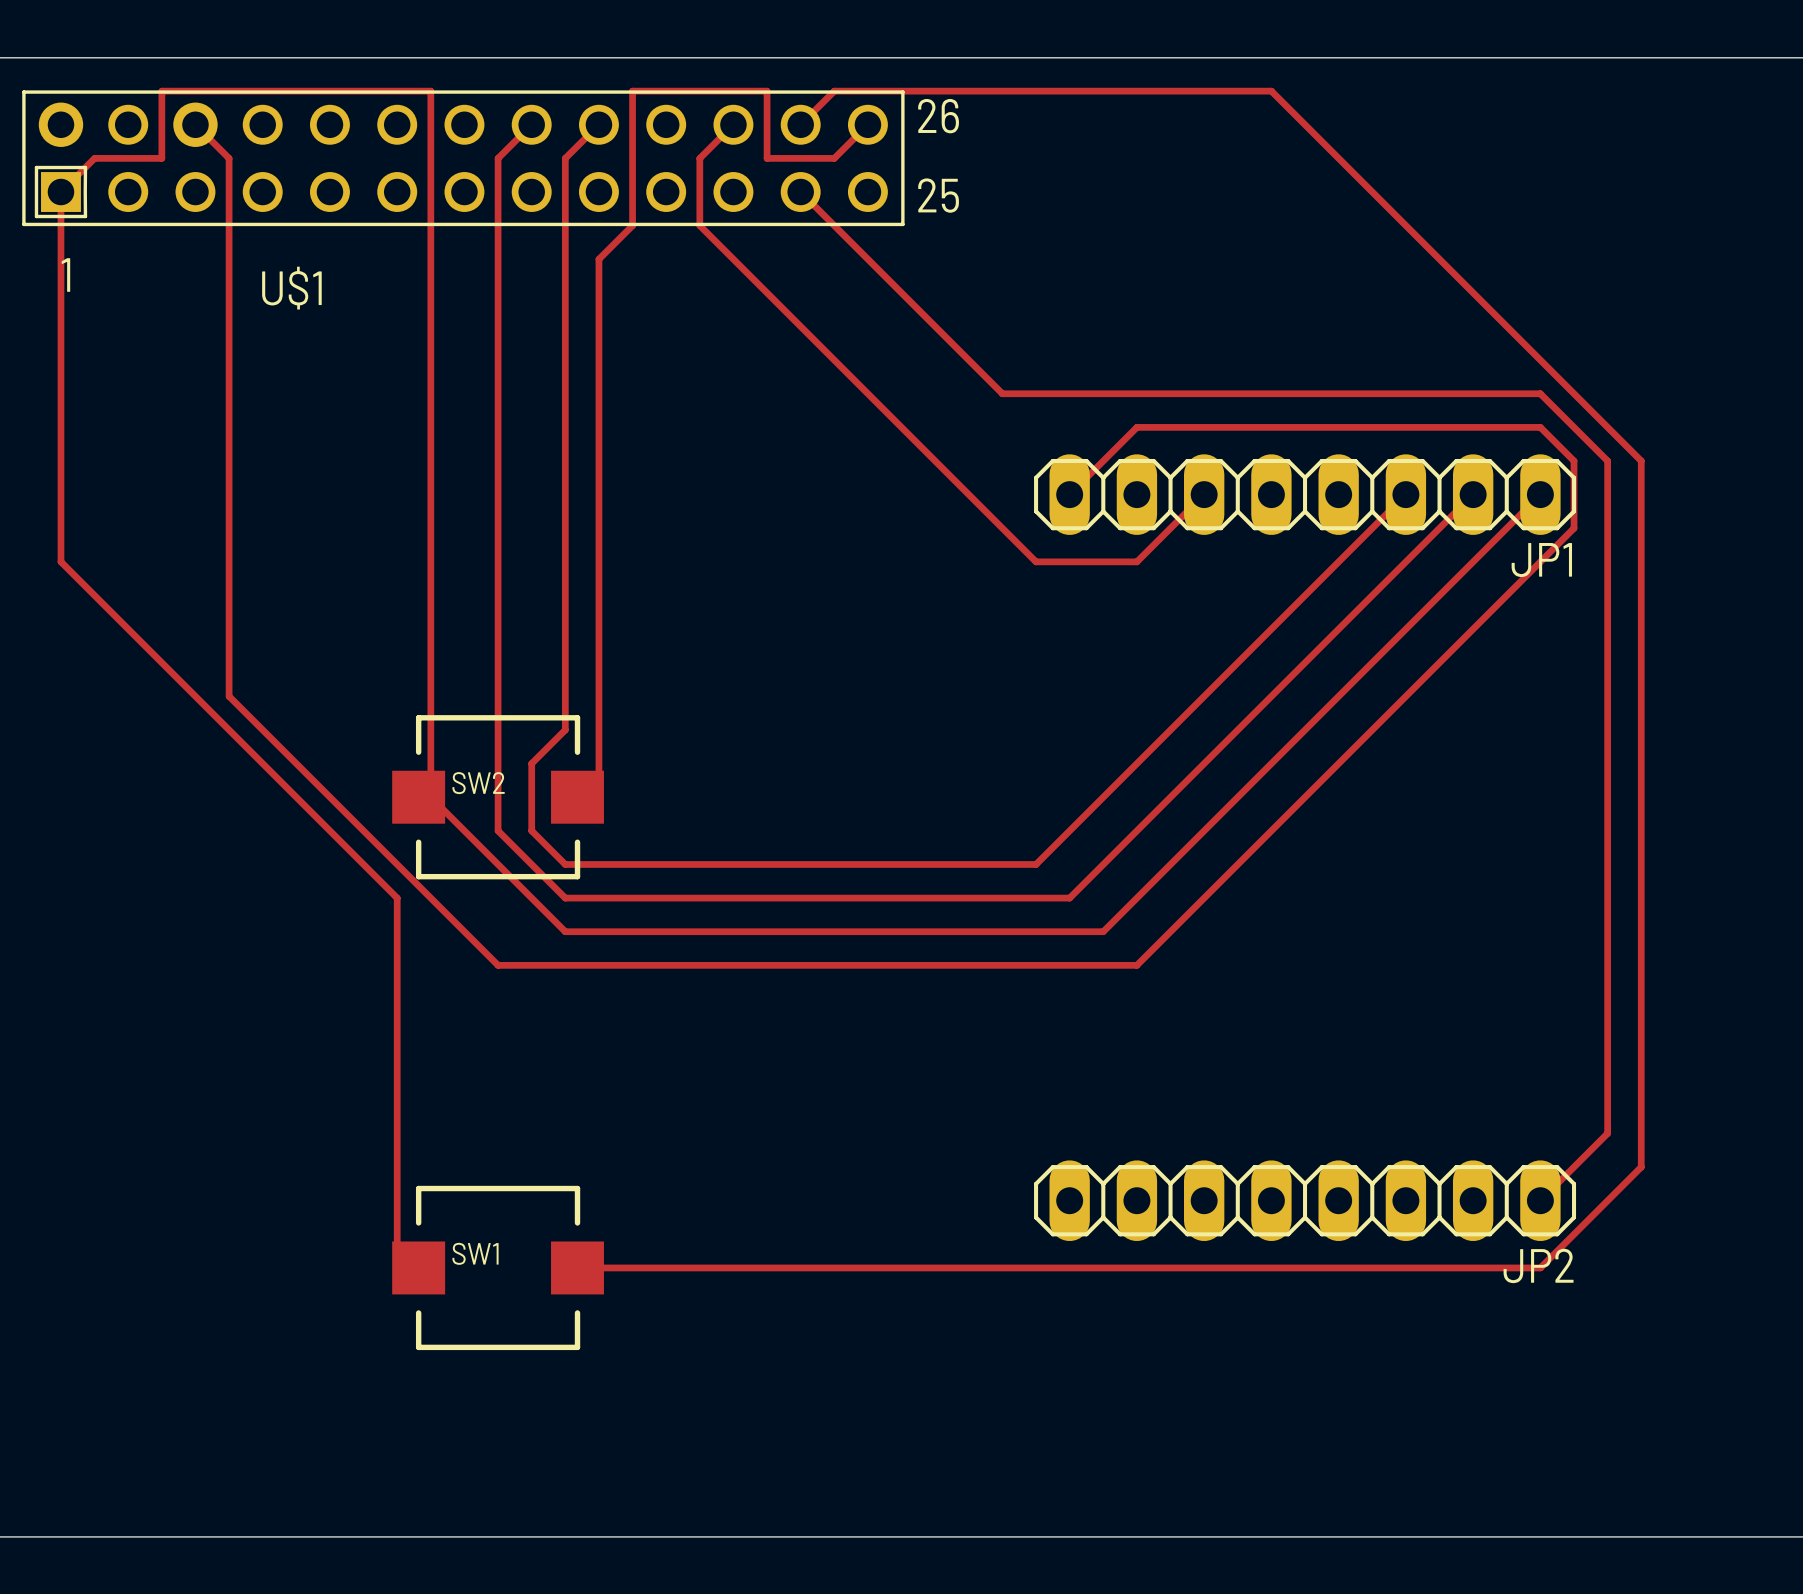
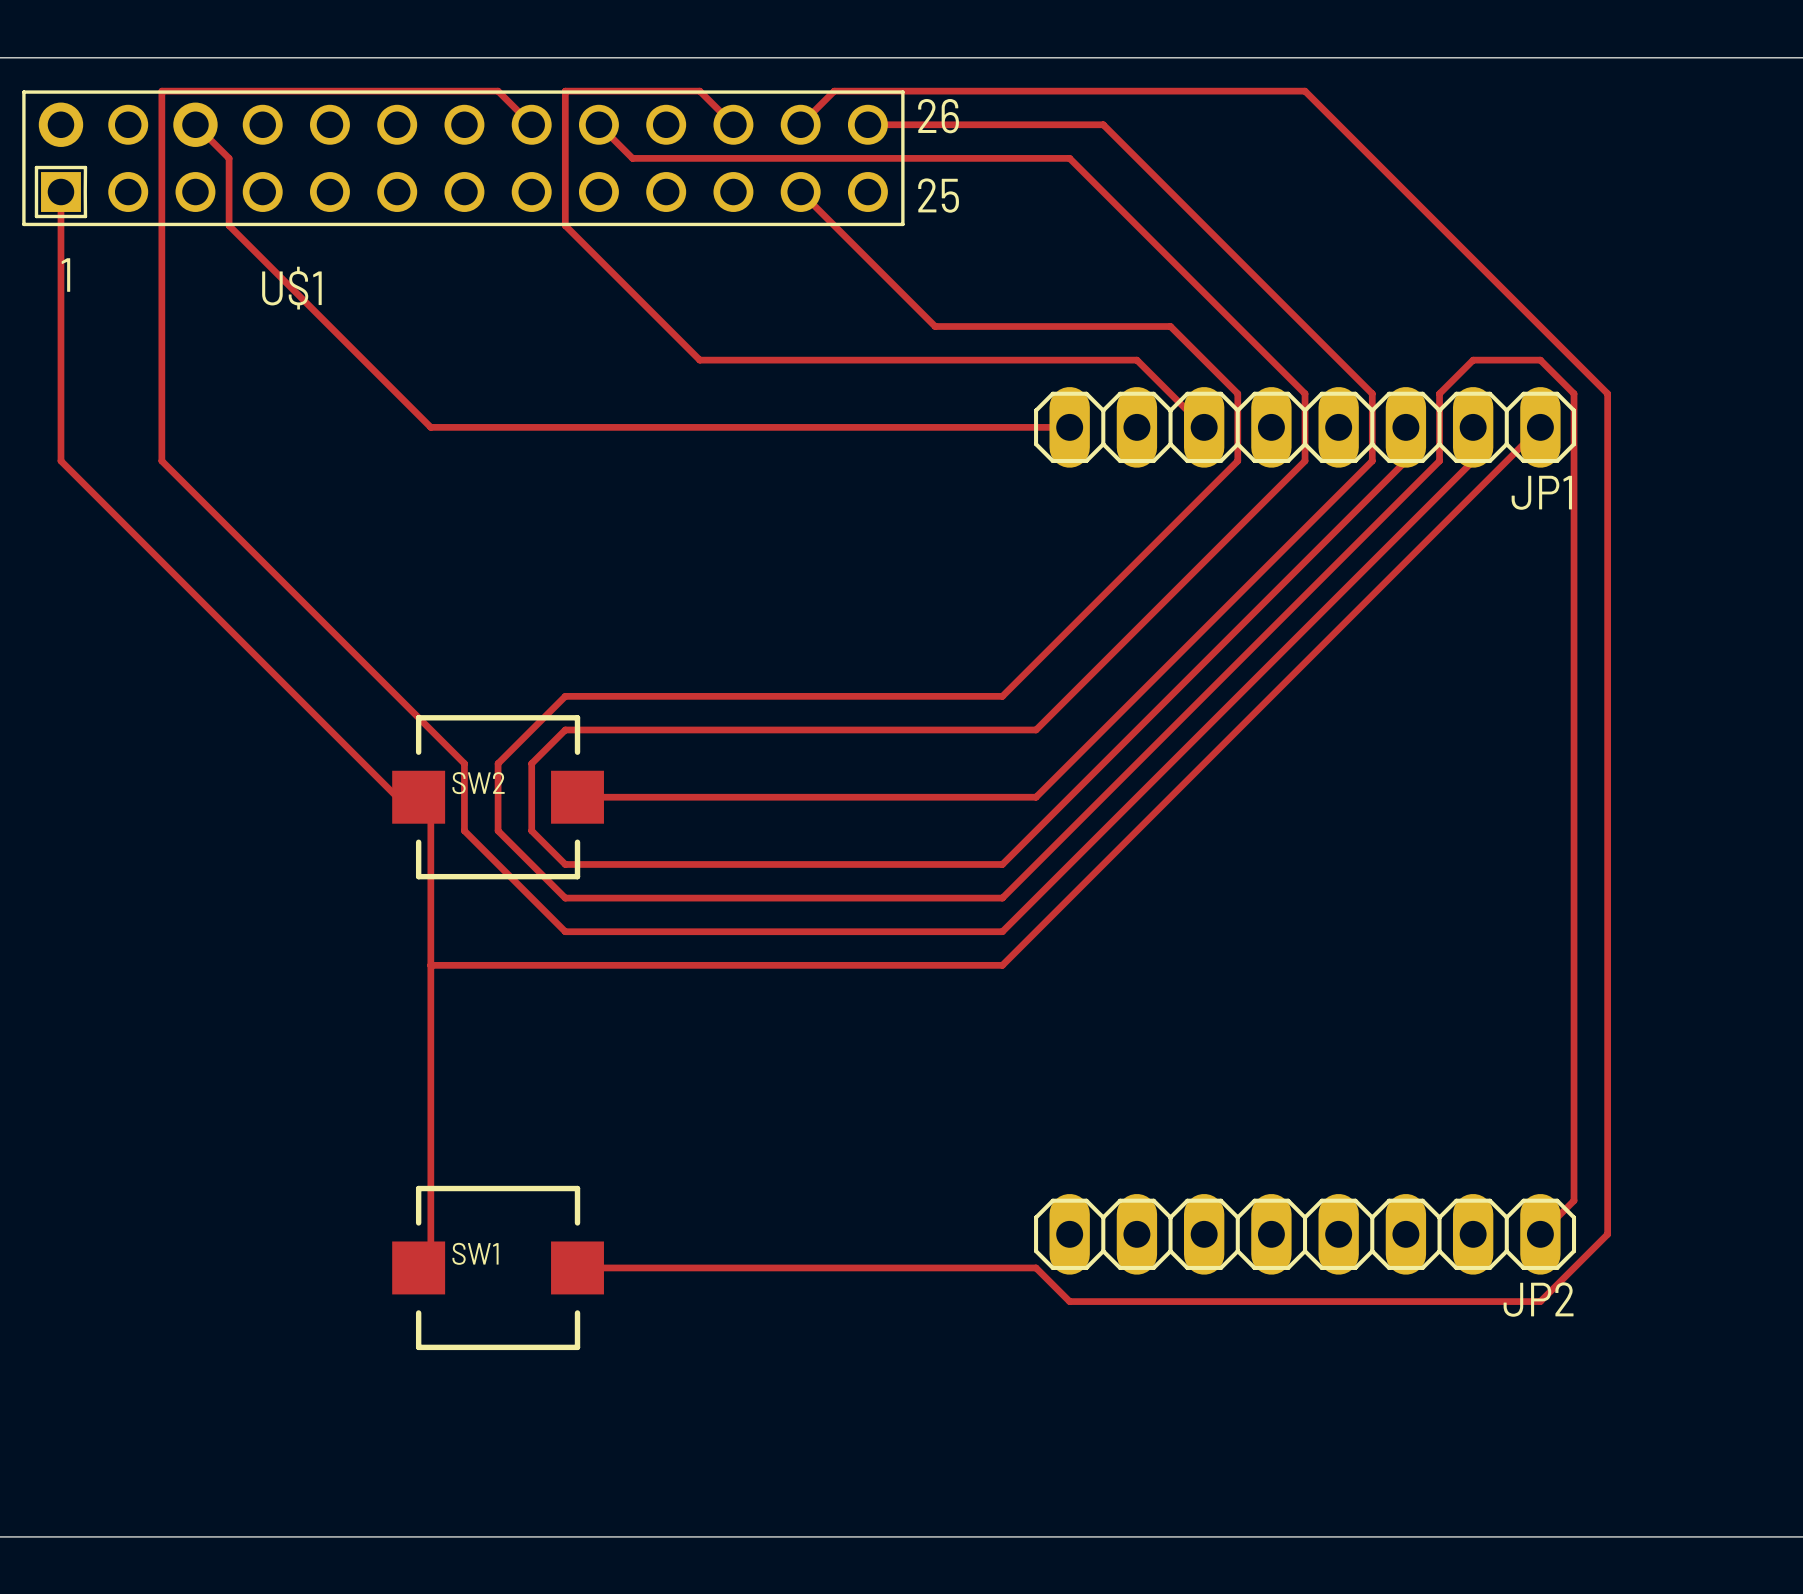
track: (430, 91) (430, 797) (464, 830) -> (161, 158) (161, 460) (464, 763) (464, 830)
track: (632, 91) (632, 225) (598, 259) (598, 797) -> (867, 124) (1103, 124) (1372, 393) (1372, 460) (1036, 797) (598, 797)
track: (699, 91) (767, 91) (767, 158) -> (699, 91) (733, 124)
track: (1271, 91) (1540, 360) -> (1271, 91) (1305, 91) (1607, 393) (1607, 460)
track: (531, 124) (498, 158) (498, 763) -> (531, 124) (498, 91) (430, 91)
track: (598, 124) (565, 158) -> (632, 91) (565, 91) (565, 158)
track: none -> (598, 124) (632, 158) (767, 158)
track: (733, 124) (699, 158) (699, 225) (1036, 561) (1136, 561) -> (498, 763) (565, 696) (1002, 696) (1136, 561)
track: (867, 124) (834, 158) -> none
track: (161, 158) (94, 158) (60, 192) -> none
track: (229, 225) (229, 696) (498, 965) -> (430, 965) (498, 965)
track: none -> (229, 225) (430, 427) (1069, 427)
track: (565, 225) (565, 729) -> (834, 158) (1069, 158) (1305, 393) (1305, 460) (1036, 729) (565, 729)
track: none -> (565, 225) (699, 360) (1136, 360) (1204, 427)
track: (935, 326) (1002, 393) (1540, 393) (1607, 460) -> (935, 326) (1170, 326) (1237, 393) (1237, 460) (1204, 494)
track: none -> (1540, 360) (1473, 360) (1439, 393) (1439, 460) (1405, 494)
track: (1574, 393) (1641, 460) (1641, 1167) (1540, 1267) (1036, 1267) -> none
track: none -> (1405, 427) (1405, 460) (1002, 864)
track: none -> (1540, 427) (1473, 494)
track: (60, 460) (60, 561) (397, 898) (397, 1267) (418, 1267) -> (60, 460) (397, 797) (418, 797)
track: (1574, 460) (1540, 427) (1136, 427) (1069, 494) -> (1574, 460) (1574, 393)
JP1 position: (1305, 494) -> (1305, 427)
track: (1540, 494) (1103, 931) (1002, 931) -> (1473, 427) (1473, 460) (1002, 931)
track: (1574, 528) (1136, 965) (1002, 965) -> (1574, 528) (1574, 1200) (1540, 1234)
track: none -> (430, 797) (430, 1267) (418, 1267)
track: (1002, 864) (1036, 864) -> (1002, 898) (1036, 864)
track: (1002, 898) (1069, 898) -> (1002, 965) (1069, 898)
track: (1607, 1133) (1540, 1200) -> (1607, 1133) (1607, 1234) (1540, 1301) (1069, 1301) (1036, 1267)
JP2 position: (1305, 1200) -> (1305, 1234)

